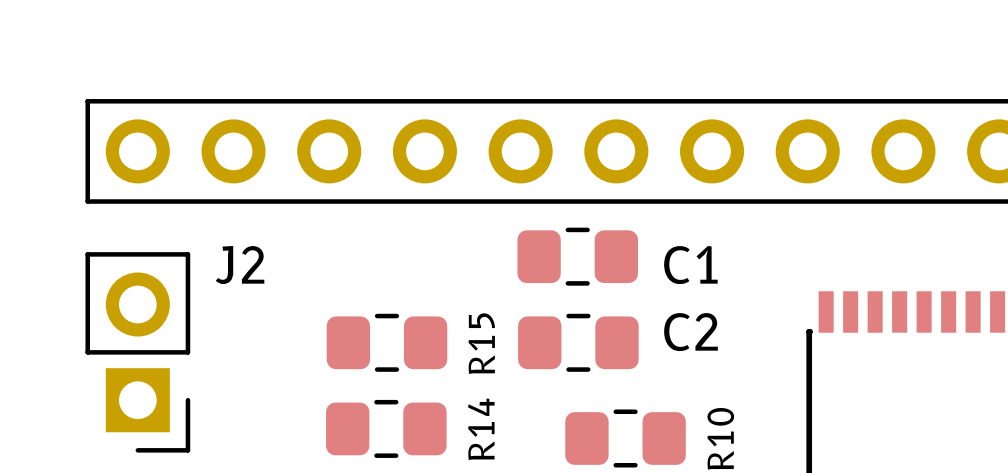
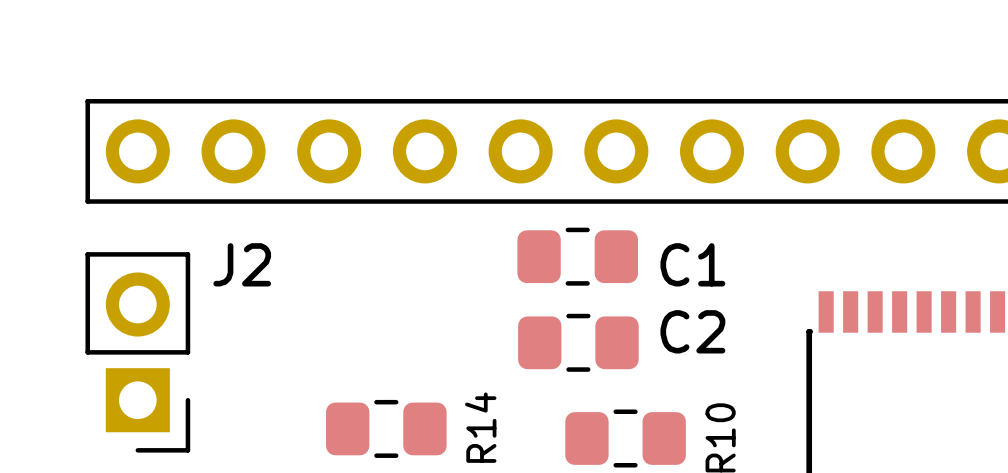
R15: (386, 342) -> none

